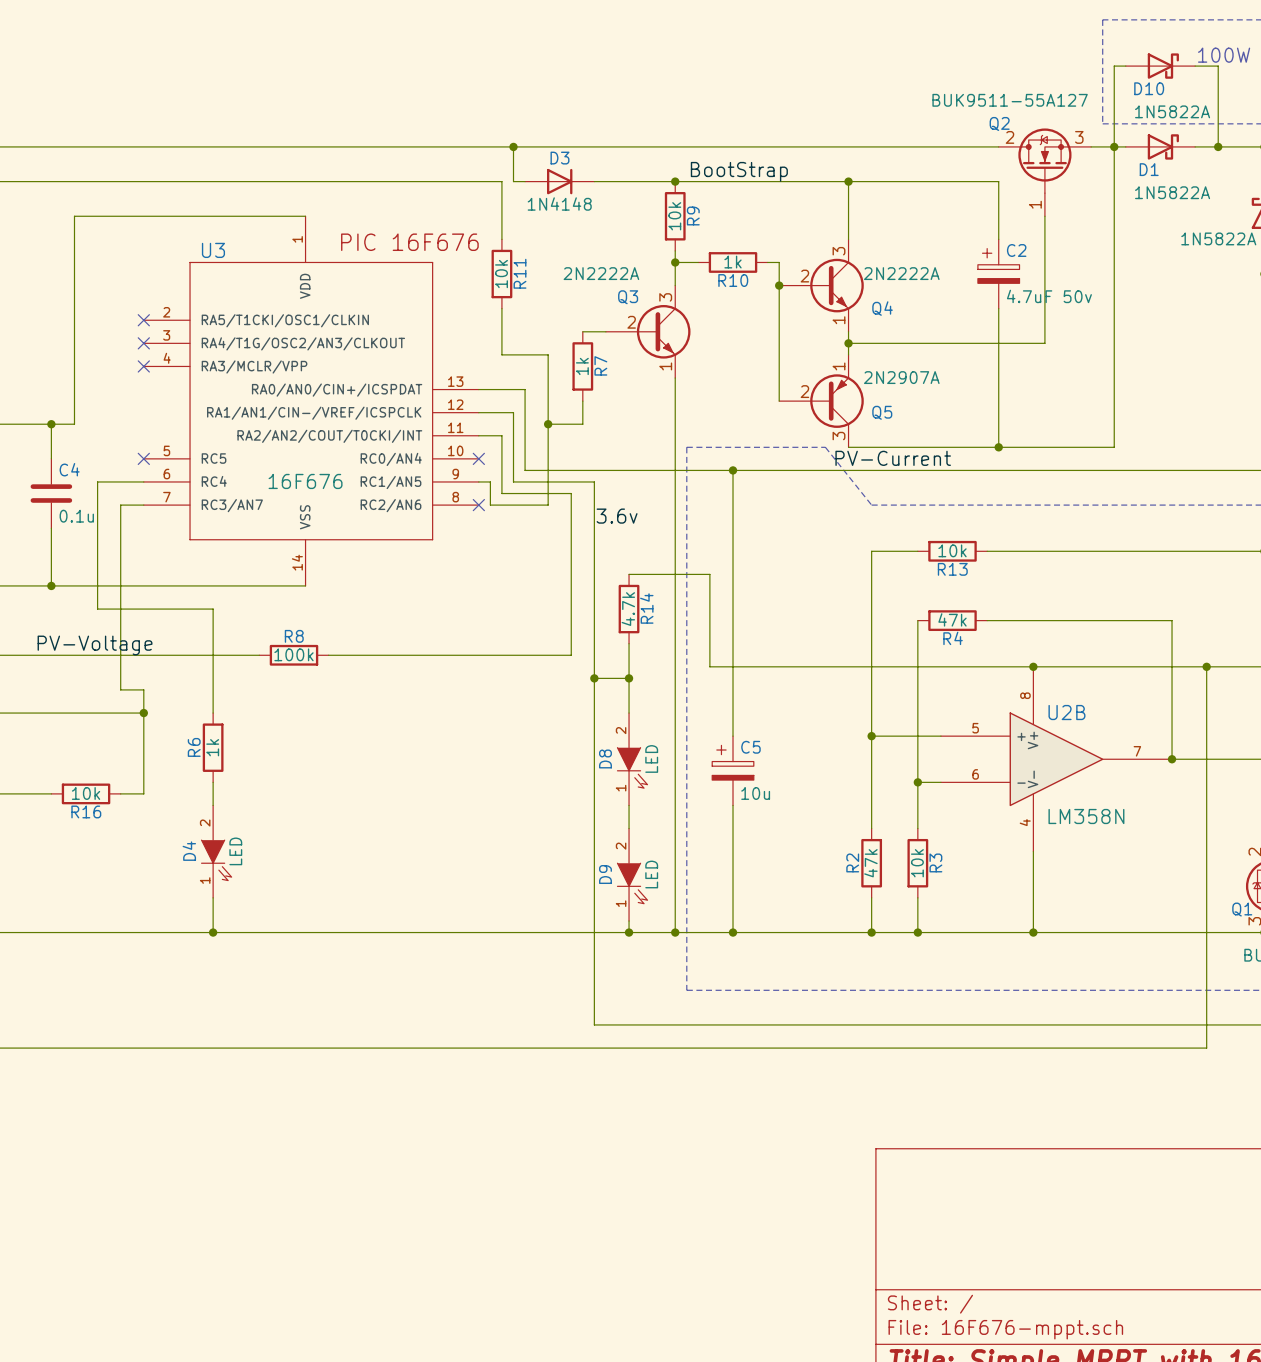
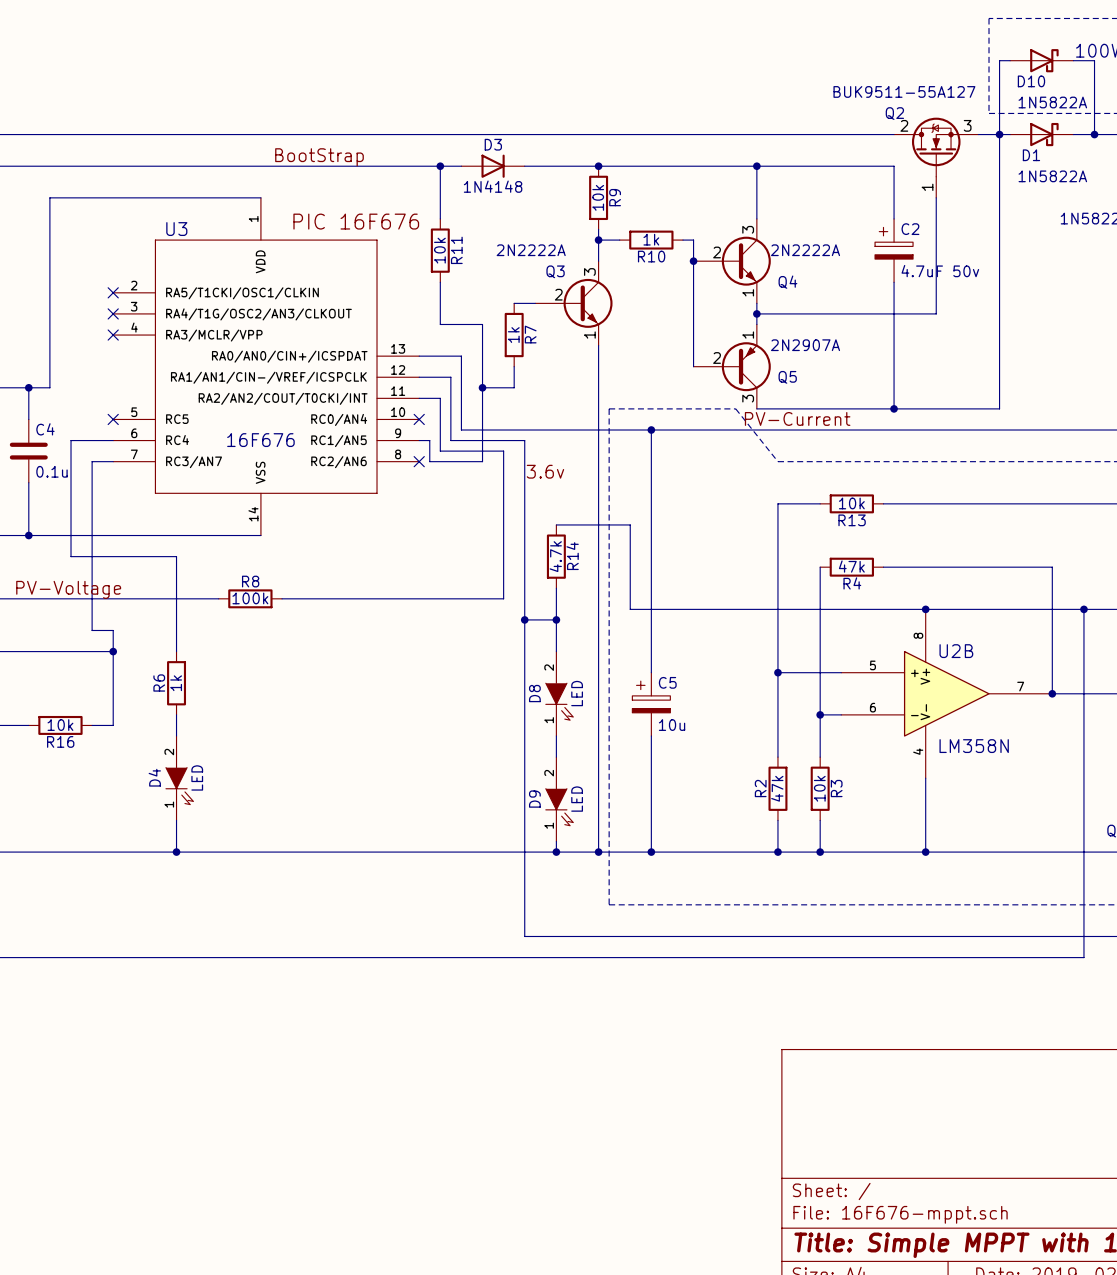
wire: (513, 146) (513, 181) -> (440, 166) (450, 166)
junction position: (513, 146) -> (440, 166)
label: none -> BootStrap (319, 157)
label: BootStrap (739, 171) -> none

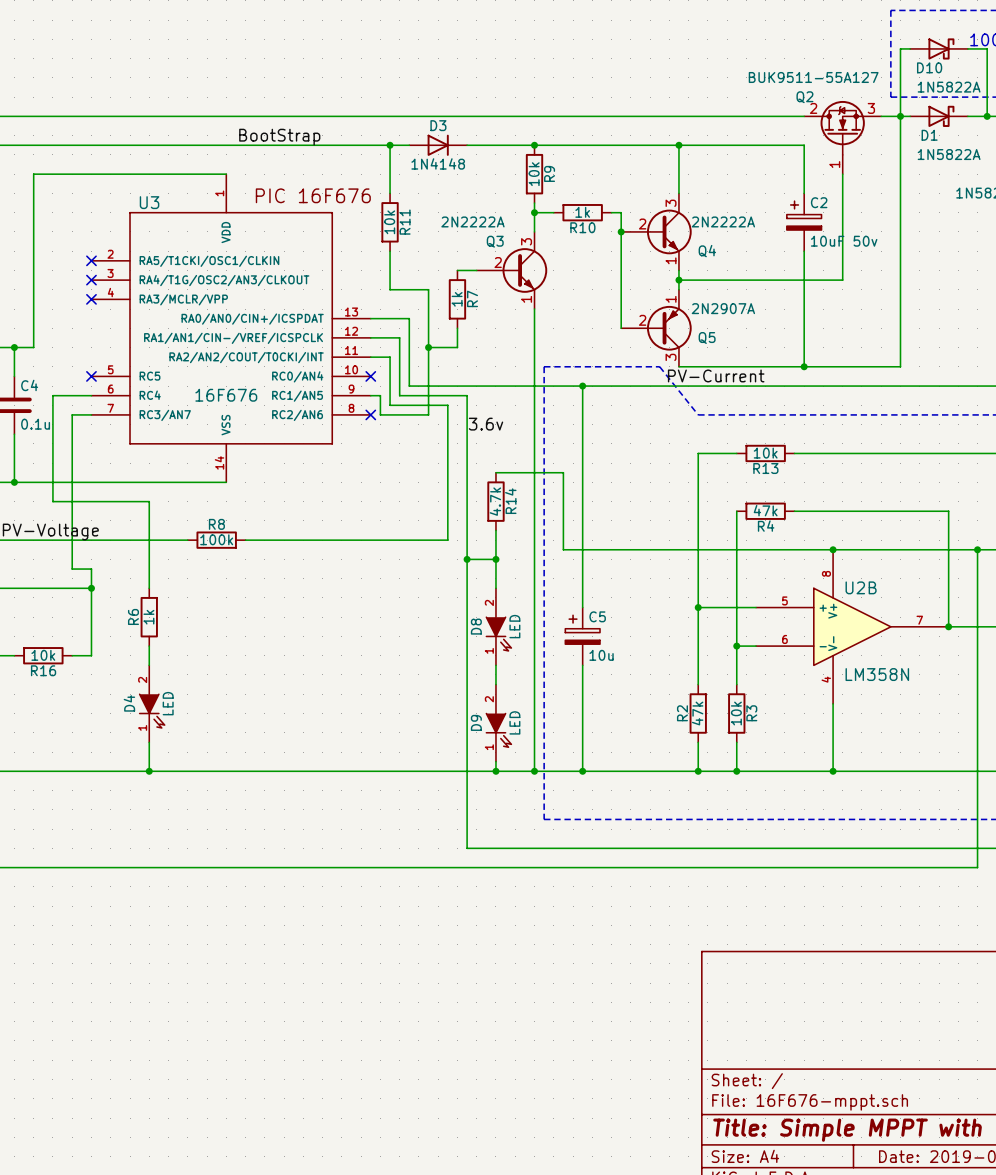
C2 value: 4.7uF 50v (940, 271) -> 10uF 50v (844, 241)

